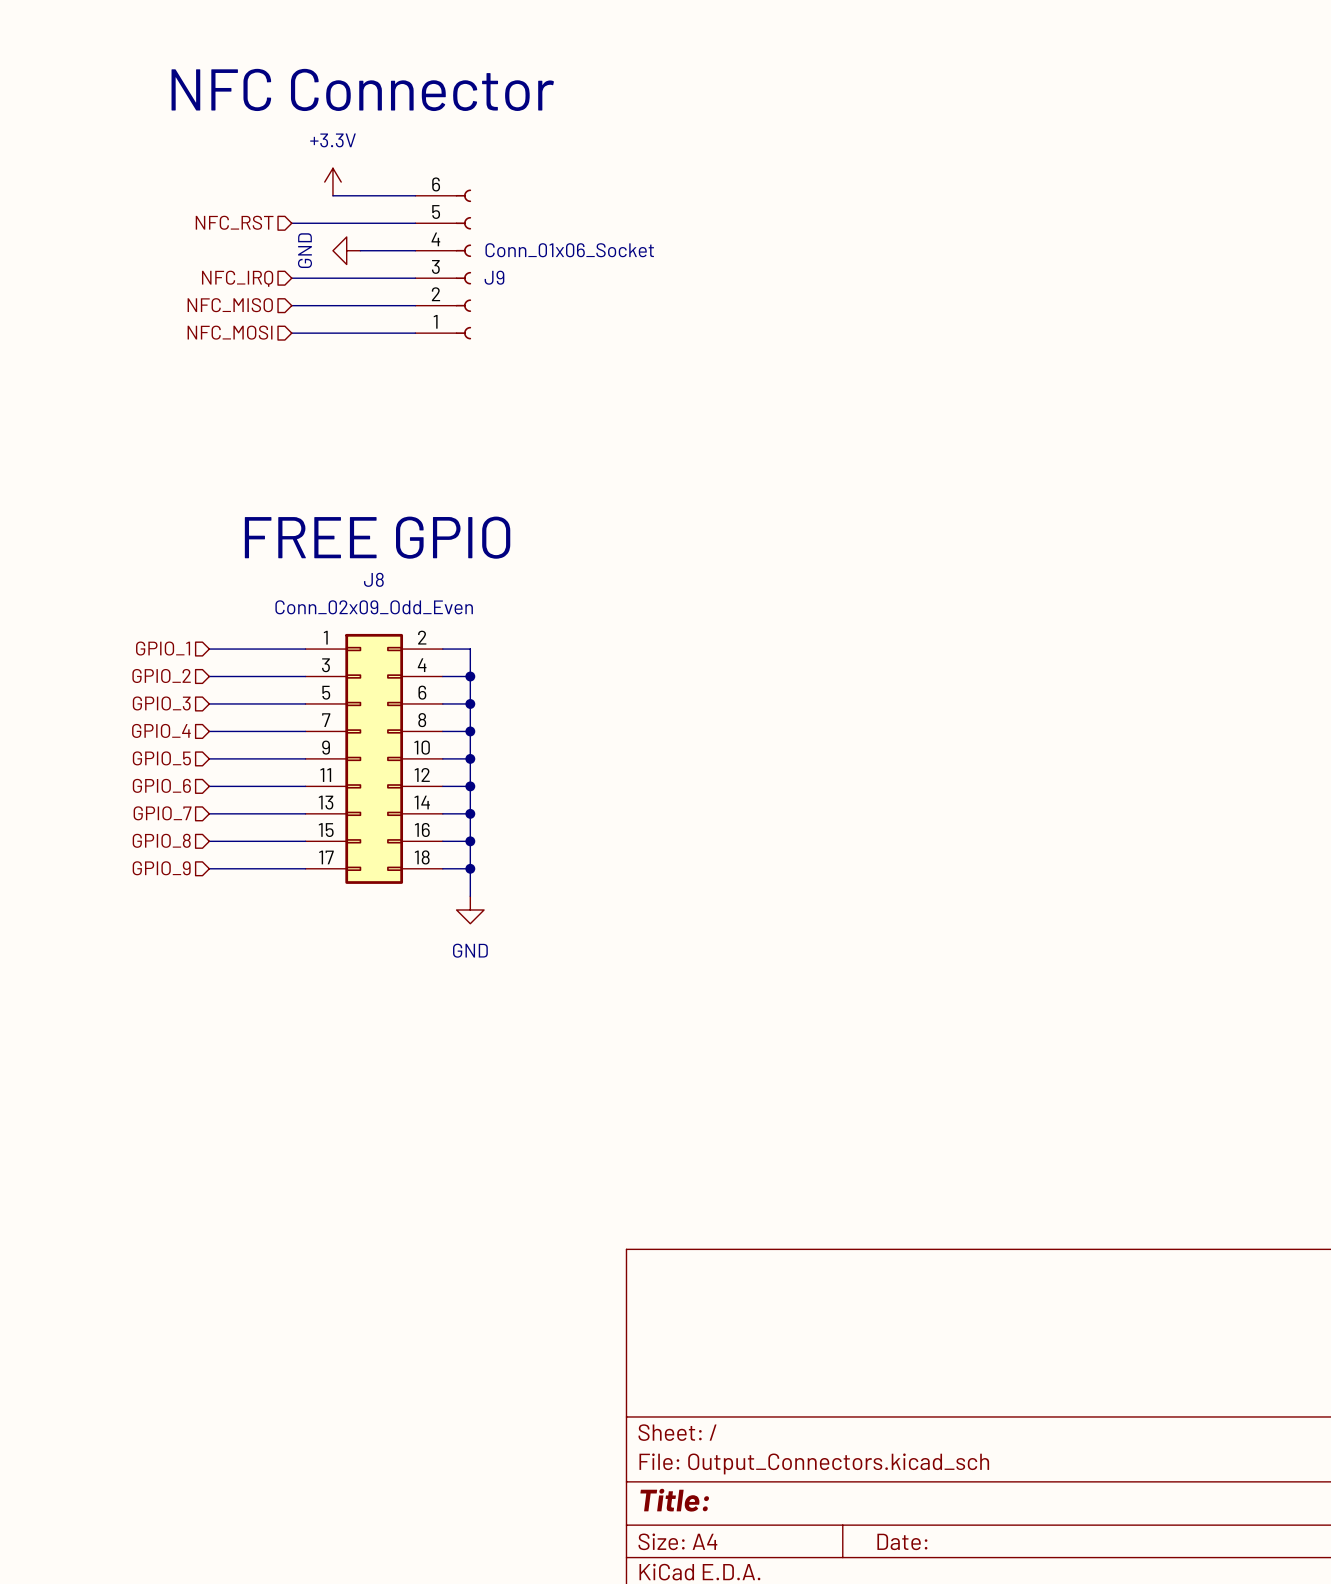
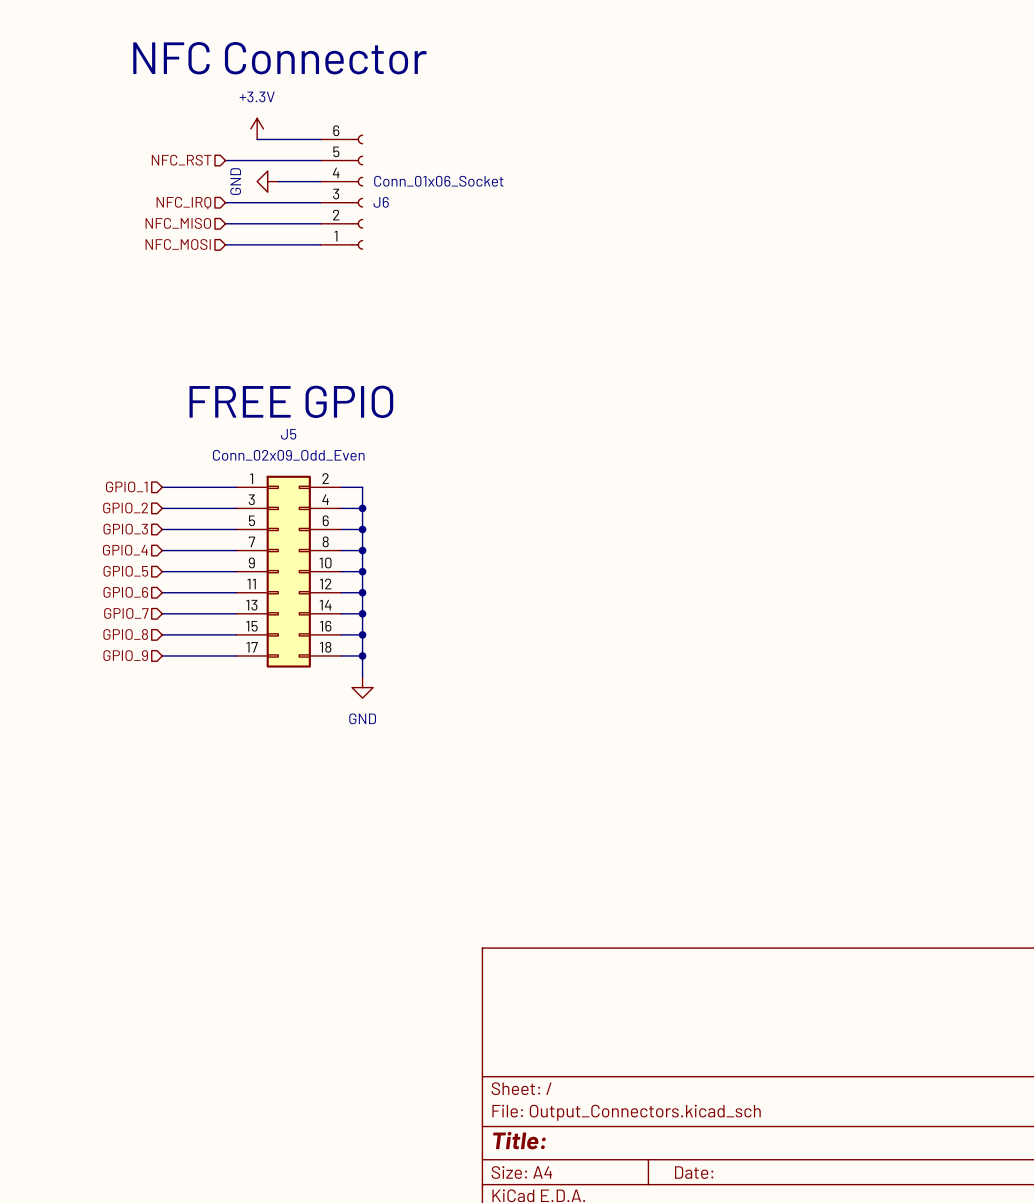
J9 name: J9 (494, 277) -> J6 (381, 202)
J8 name: J8 (373, 579) -> J5 (288, 434)

